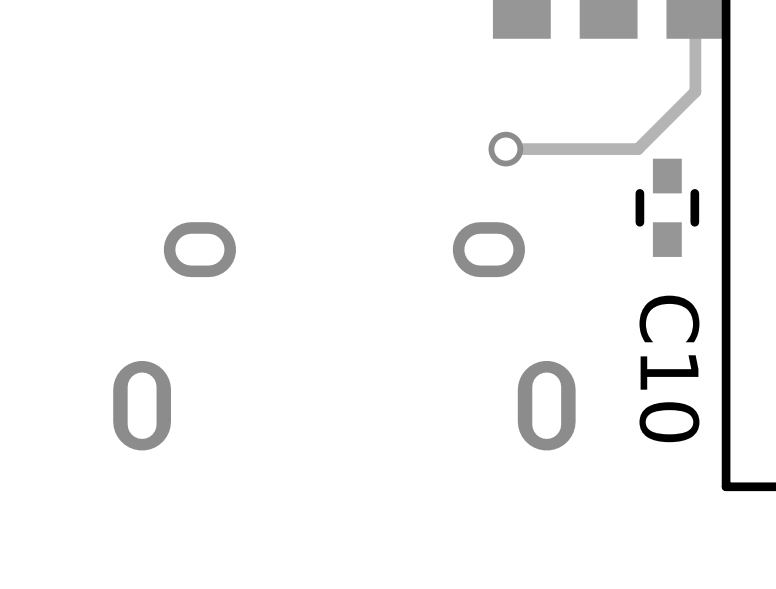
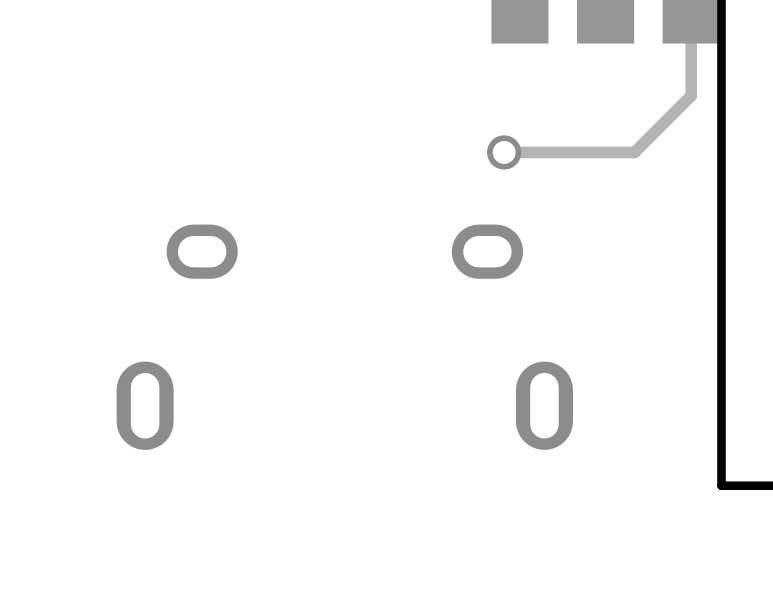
C10: (667, 207) -> none

